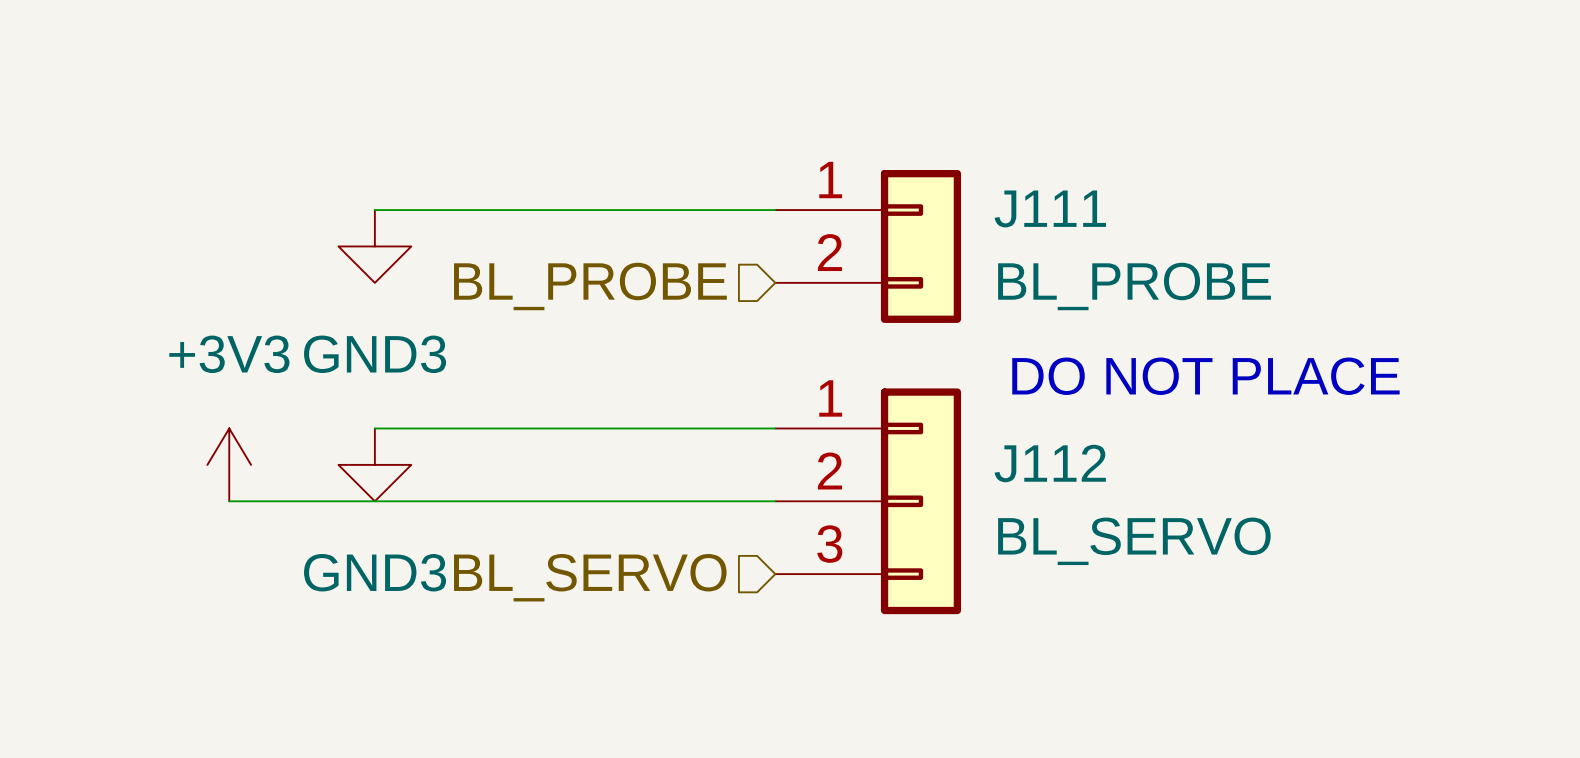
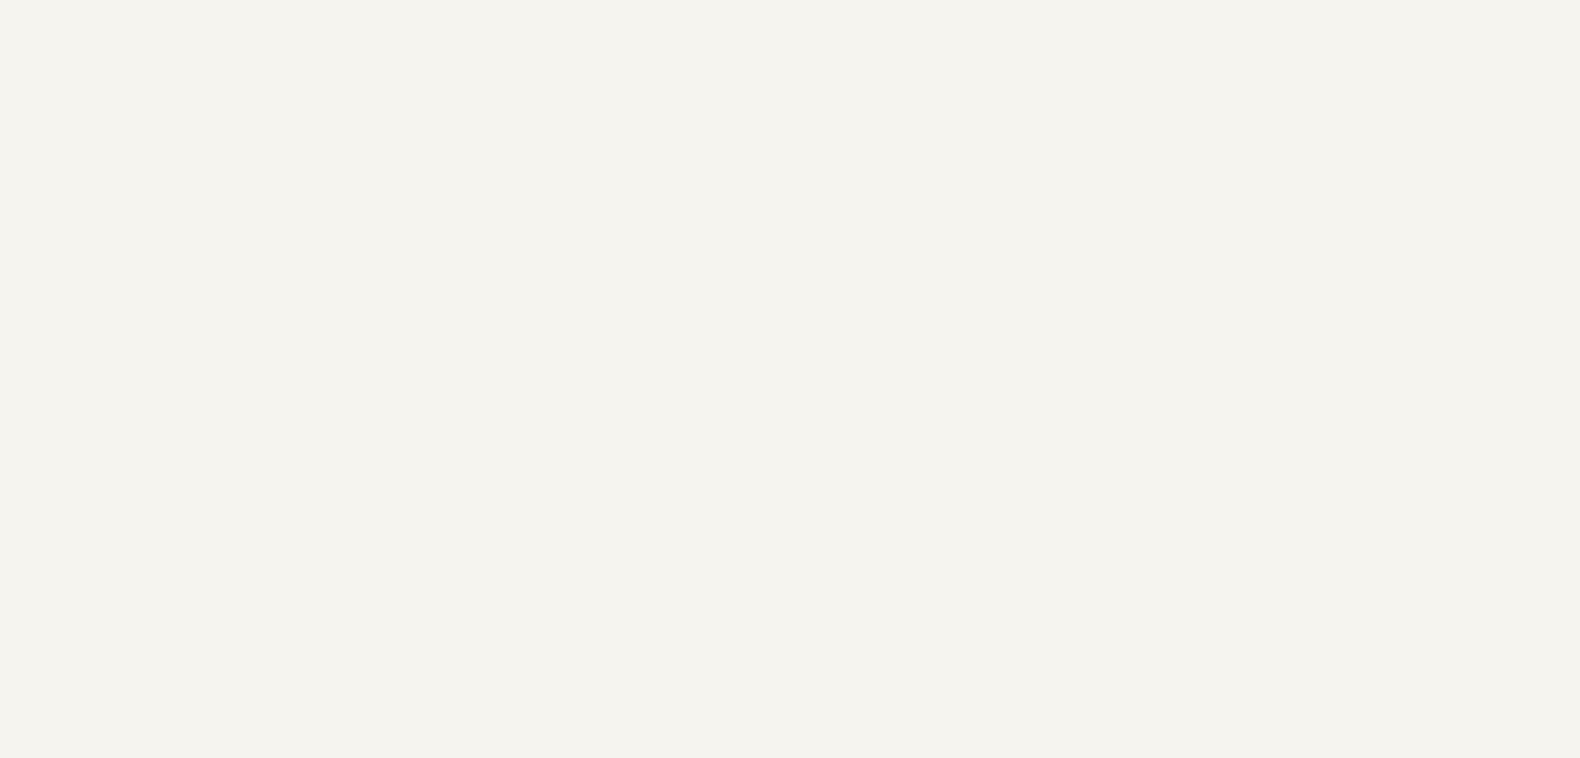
wire: (374, 210) (775, 210) -> none
power symbol: GND3 (374, 246) -> none
J111: BL_PROBE (868, 246) -> none
hierarchical label: BL_PROBE (590, 286) -> none
text: DO NOT PLACE (1205, 376) -> none
wire: (374, 428) (775, 428) -> none
power symbol: +3V3 (229, 464) -> none
power symbol: GND3 (374, 464) -> none
wire: (229, 501) (775, 501) -> none
J112: BL_SERVO (868, 501) -> none
hierarchical label: BL_SERVO (590, 577) -> none

